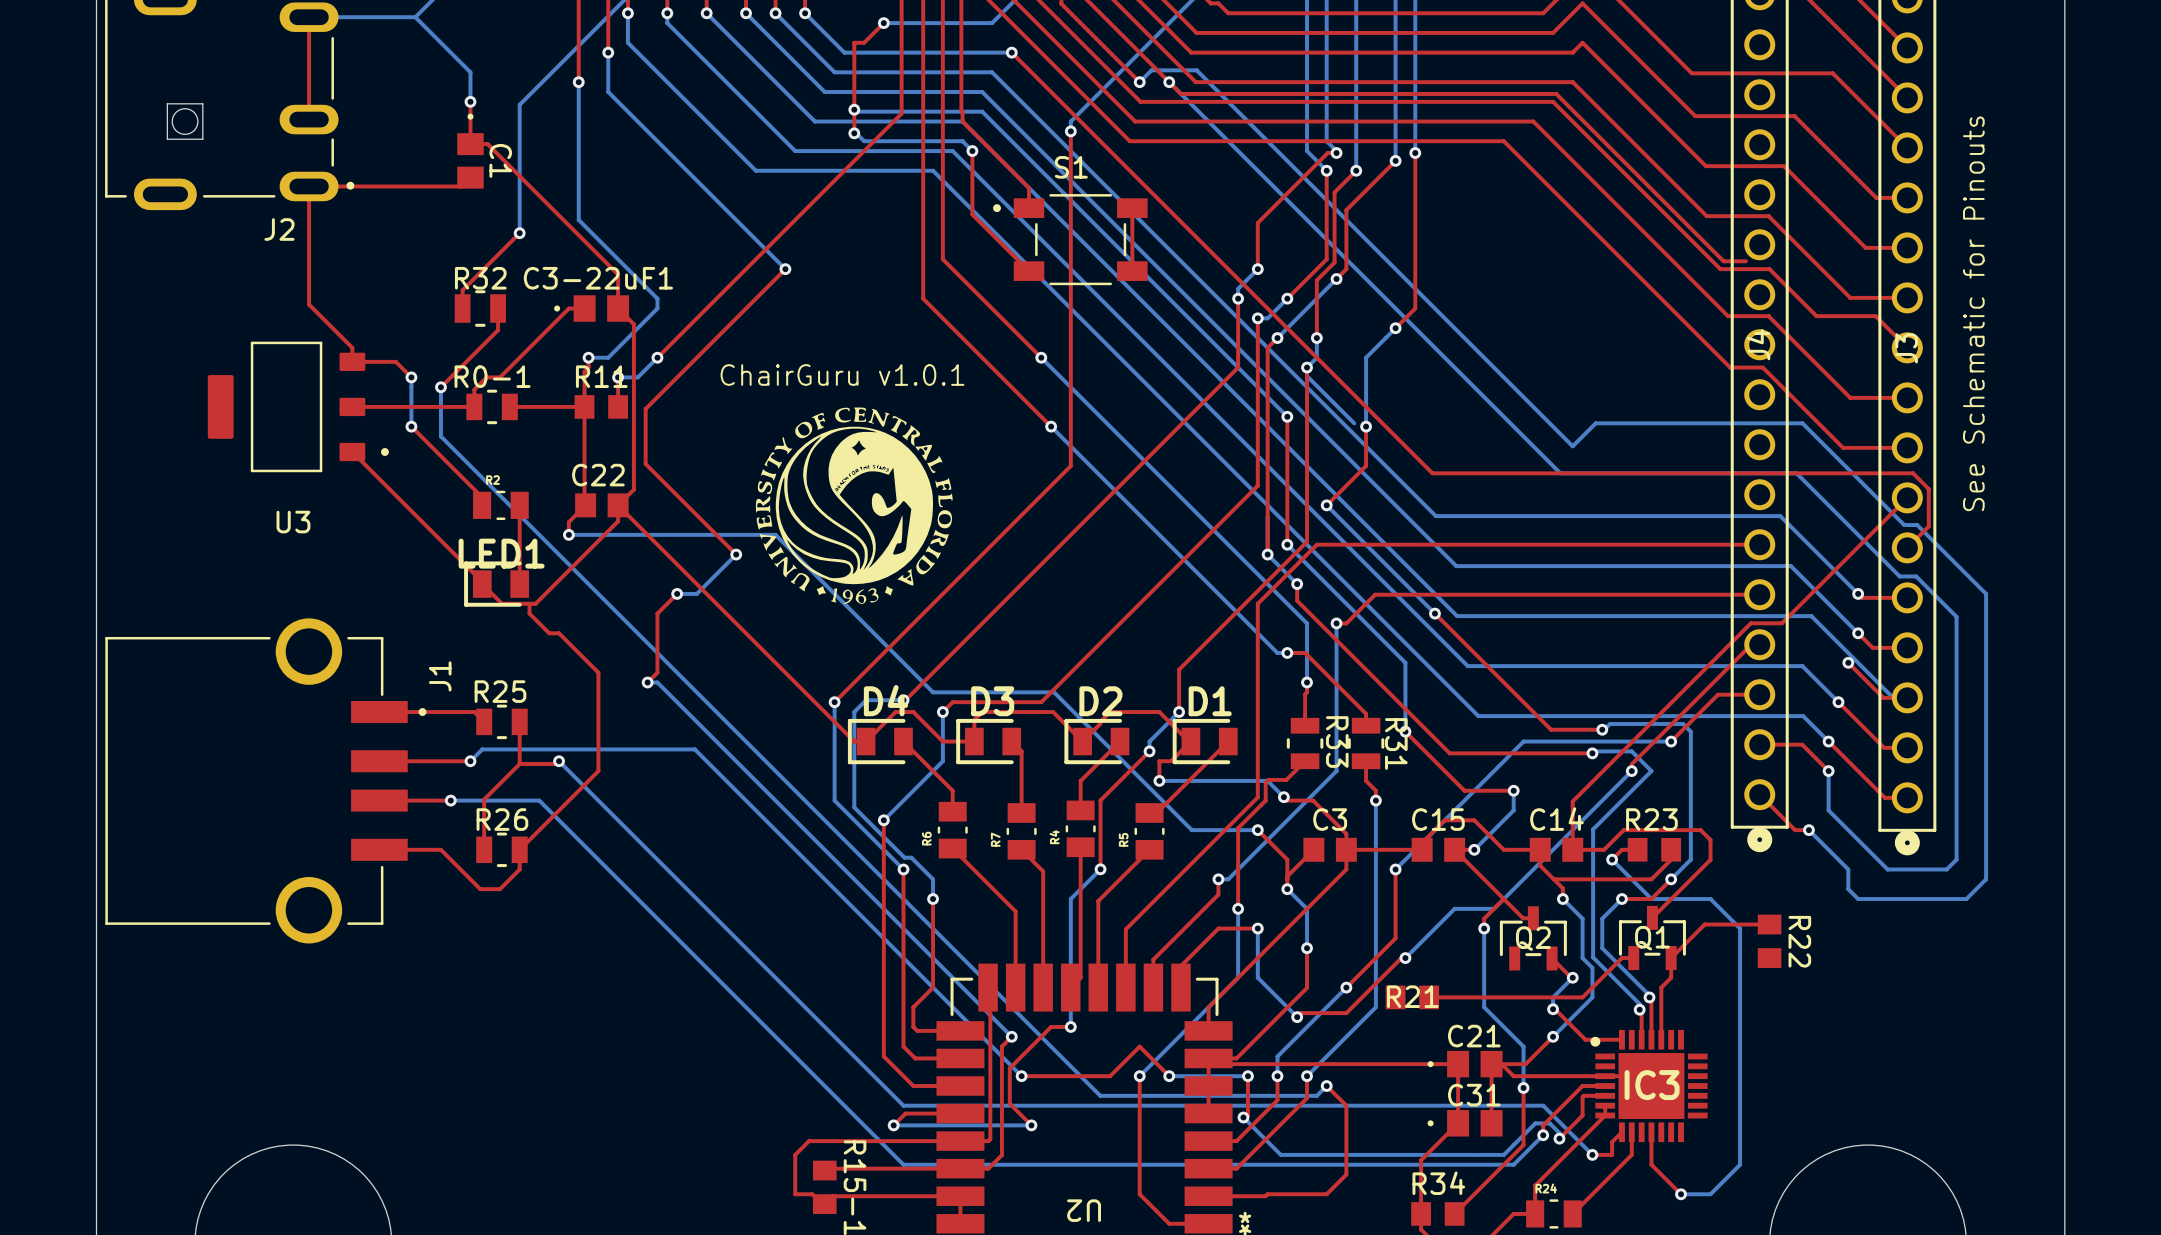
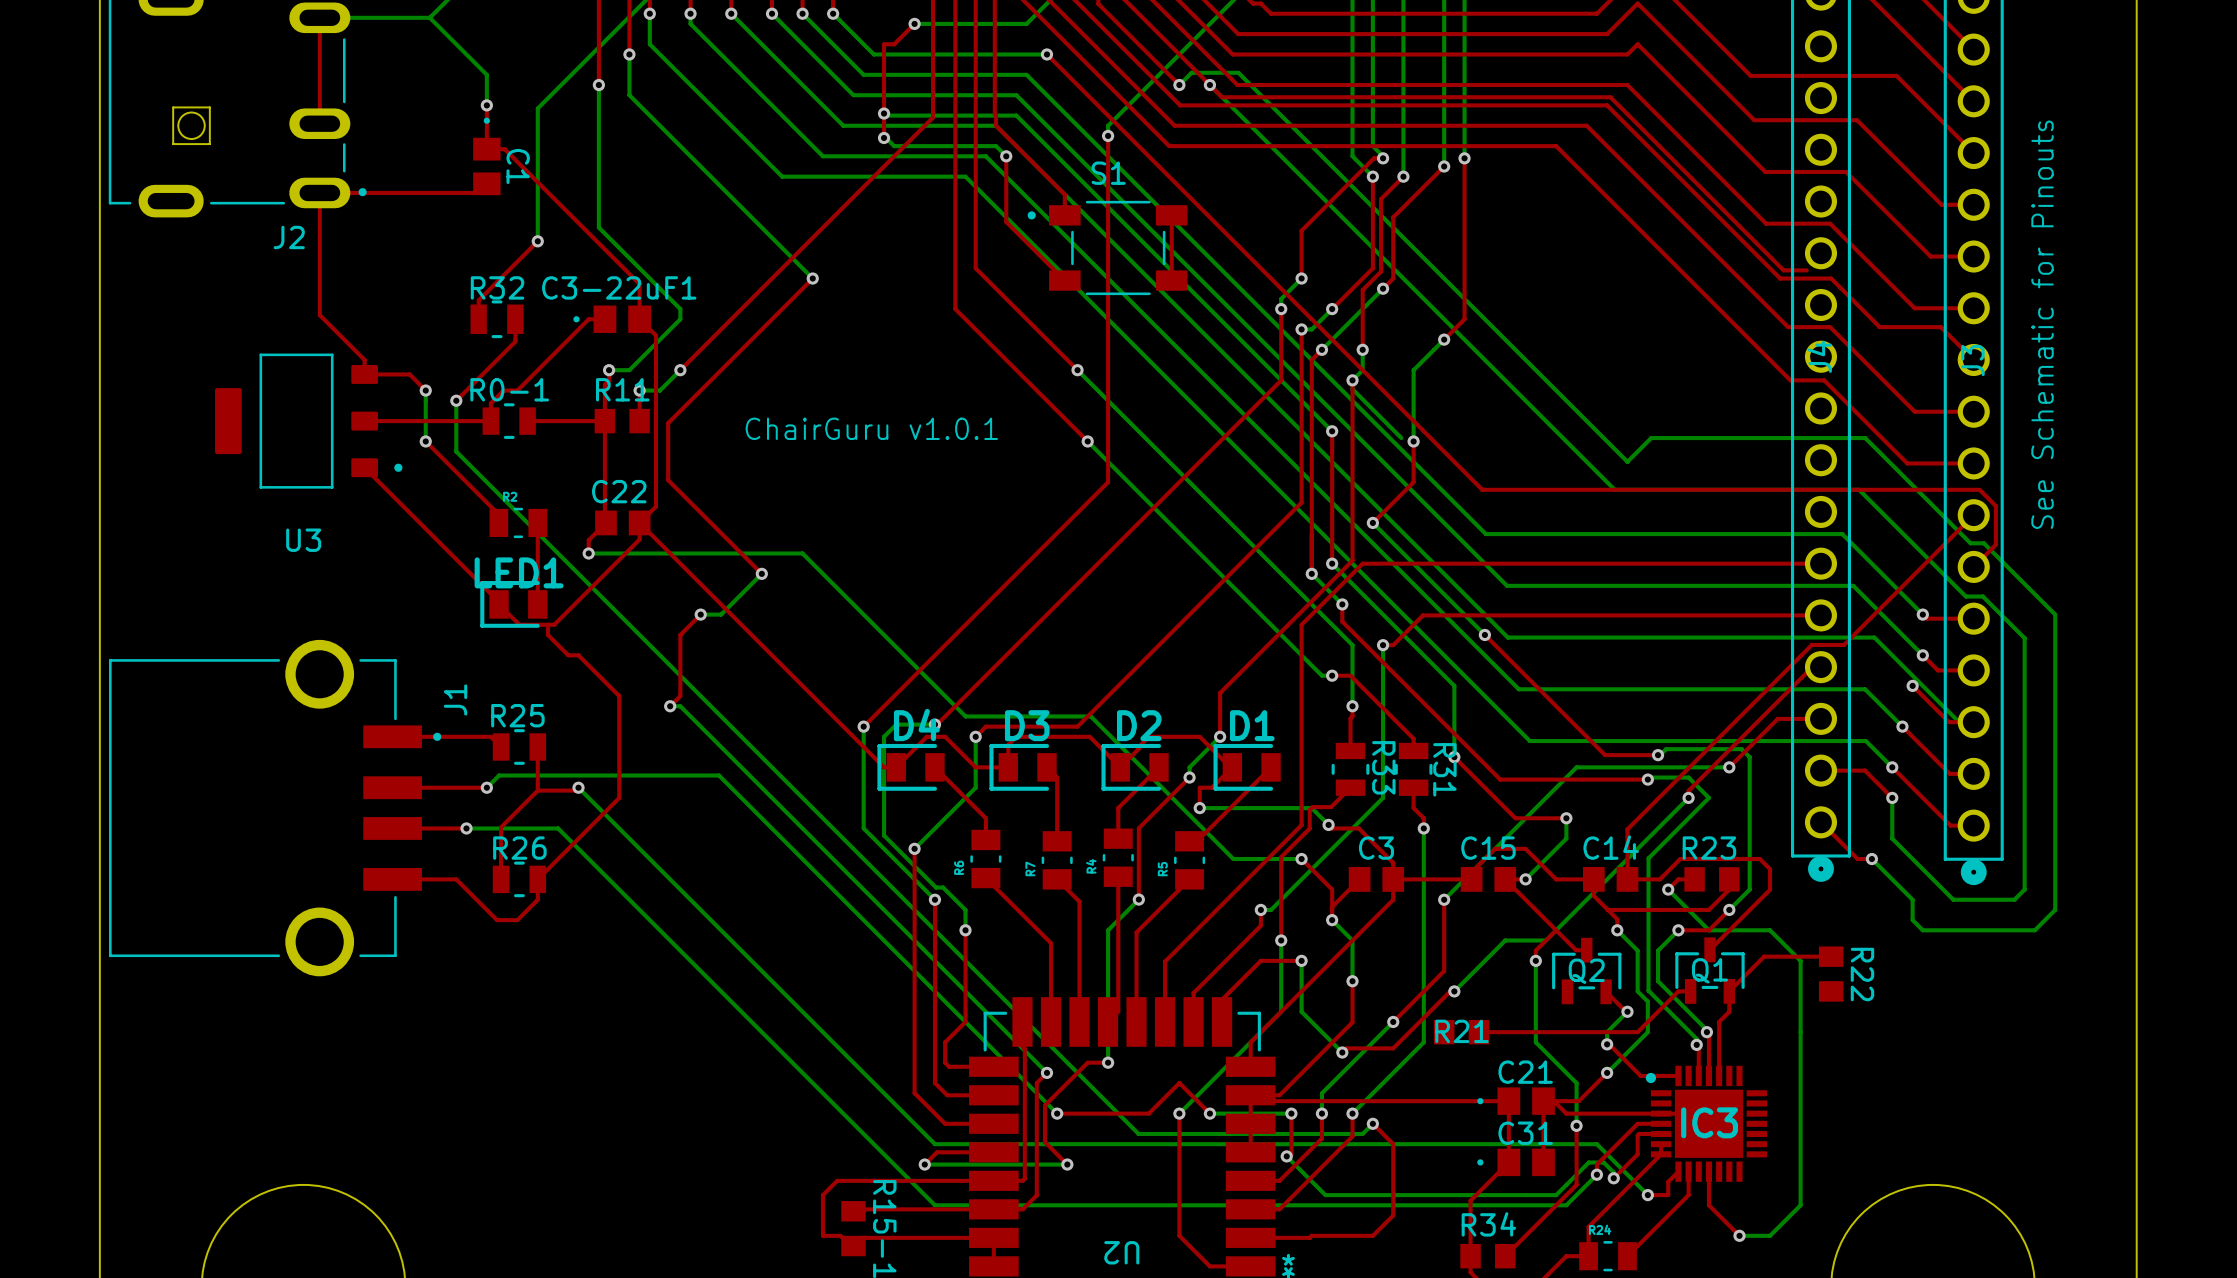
text position: ChairGuru v1.0.1 (842, 375) -> ChairGuru v1.0.1 (871, 428)
drawing: [755, 407, 953, 604] -> none

